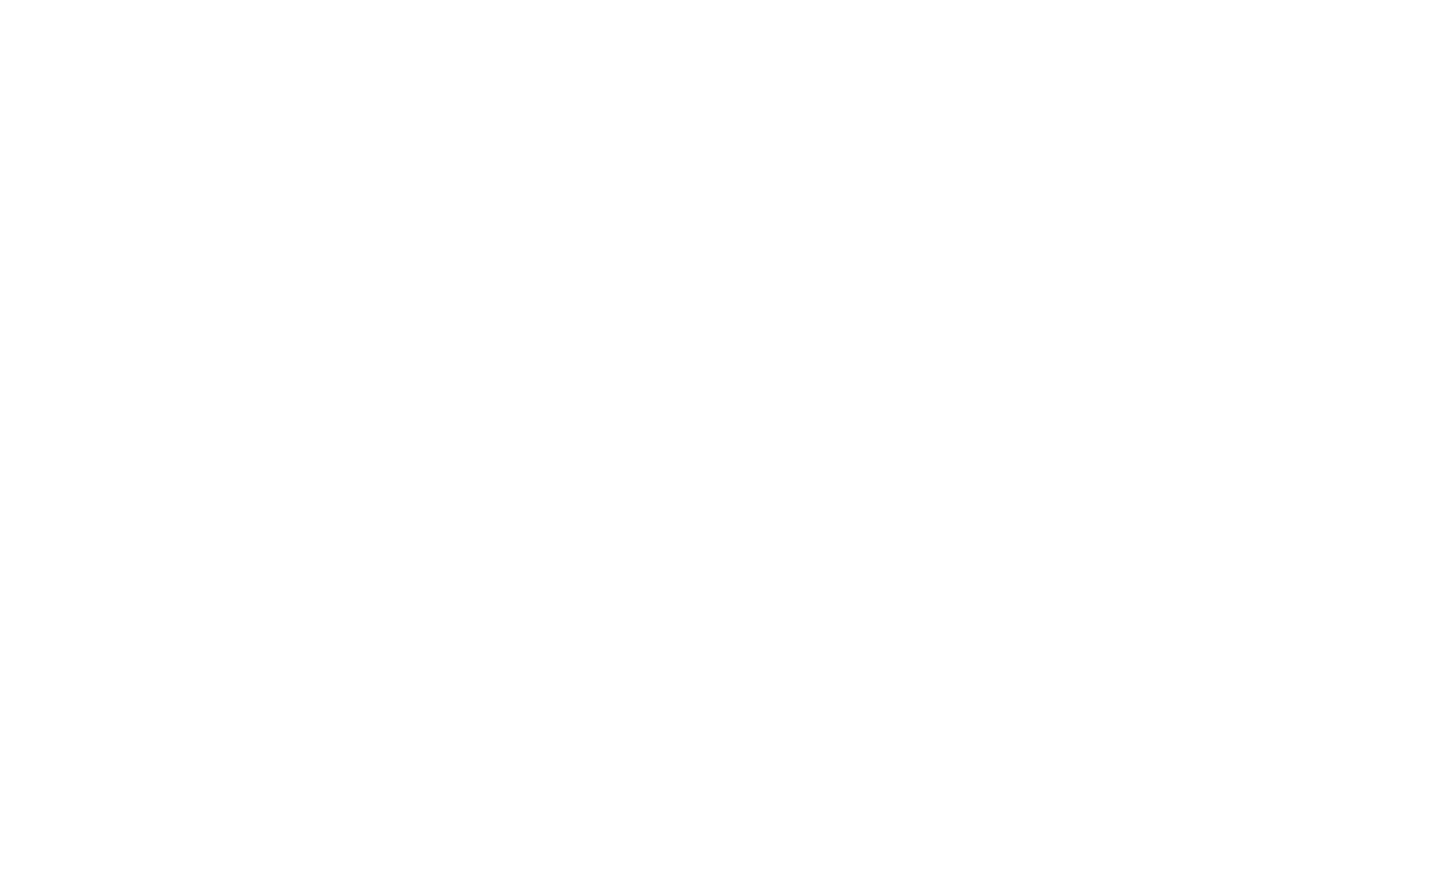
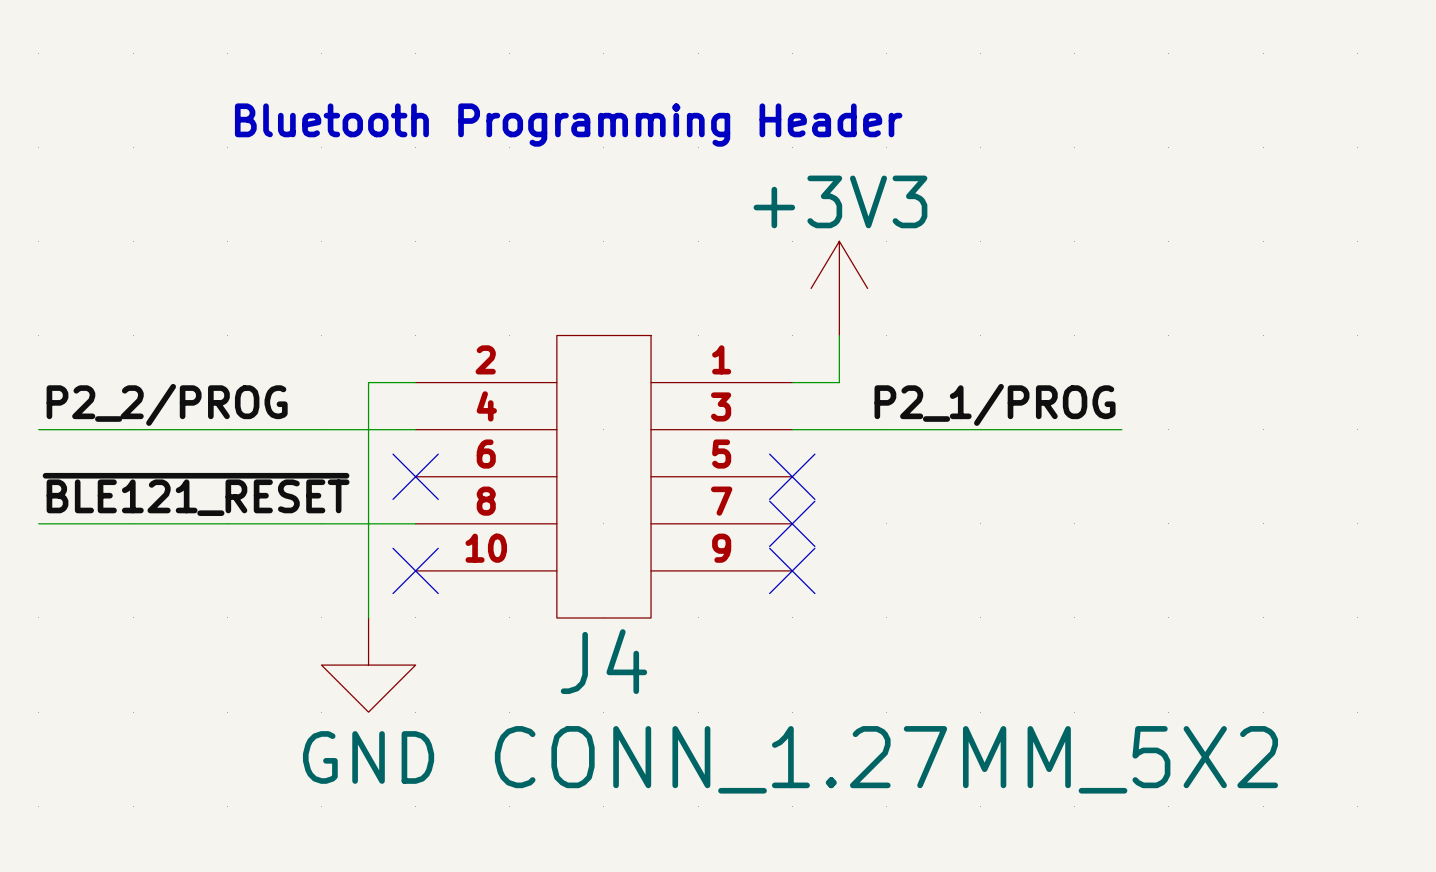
text: none -> Bluetooth Programming Header (568, 125)
power symbol: none -> +3V3 (839, 288)
wire: none -> (839, 335) (839, 382) (792, 382)
wire: none -> (415, 382) (368, 382) (368, 617)
label: none -> P2_2/PROG (167, 404)
label: none -> P2_1/PROG (995, 404)
wire: none -> (38, 429) (415, 429)
wire: none -> (792, 429) (1121, 429)
no-connect mark: none -> (415, 476)
J4: none -> CONN_1.27MM_5X2 (603, 476)
no-connect mark: none -> (792, 476)
label: none -> ~{BLE121_RESET} (196, 494)
wire: none -> (38, 523) (415, 523)
no-connect mark: none -> (792, 523)
no-connect mark: none -> (415, 570)
no-connect mark: none -> (792, 570)
power symbol: none -> GND (368, 665)

